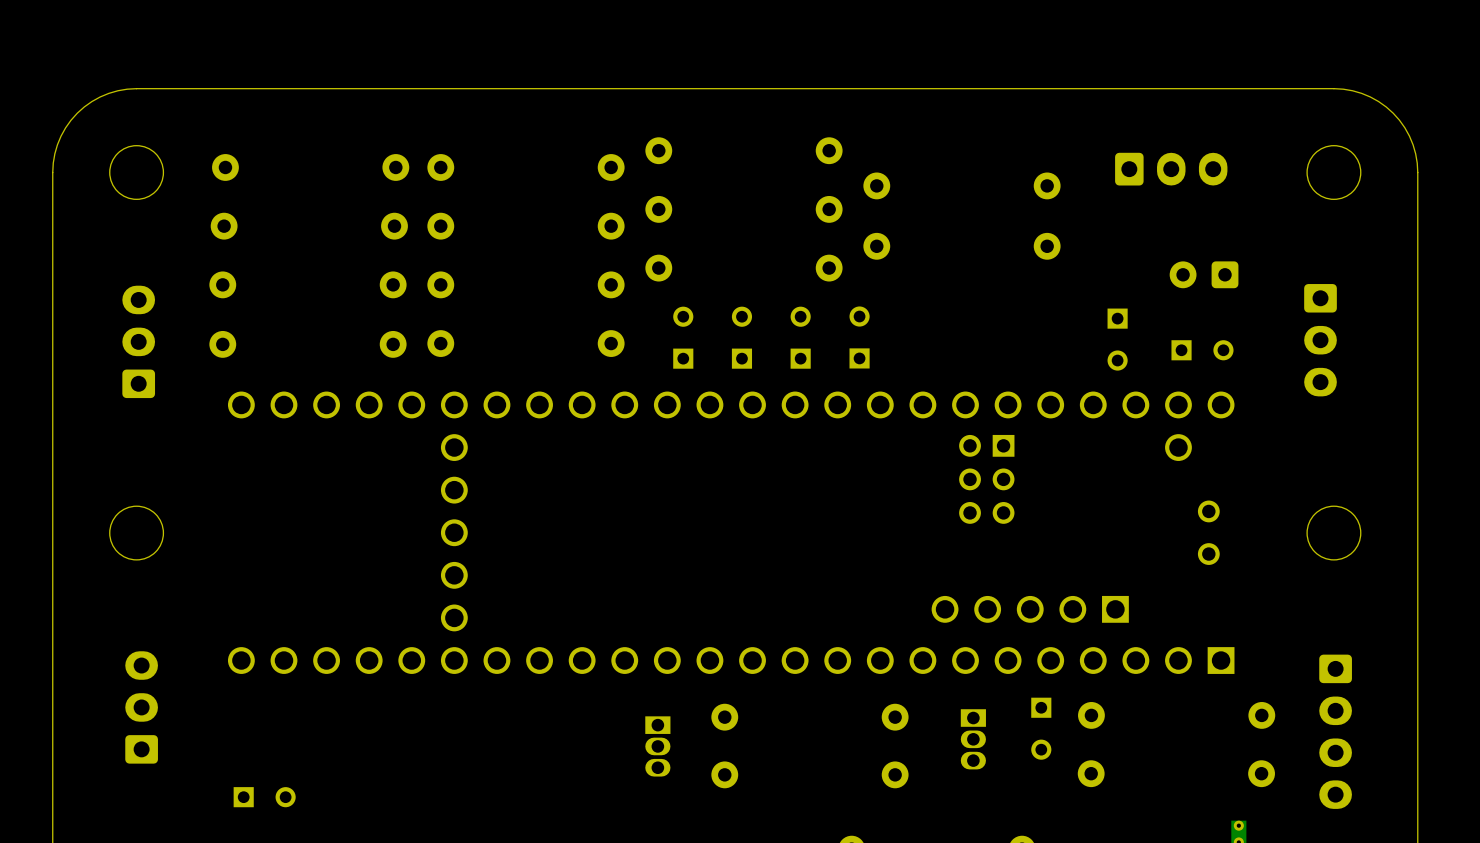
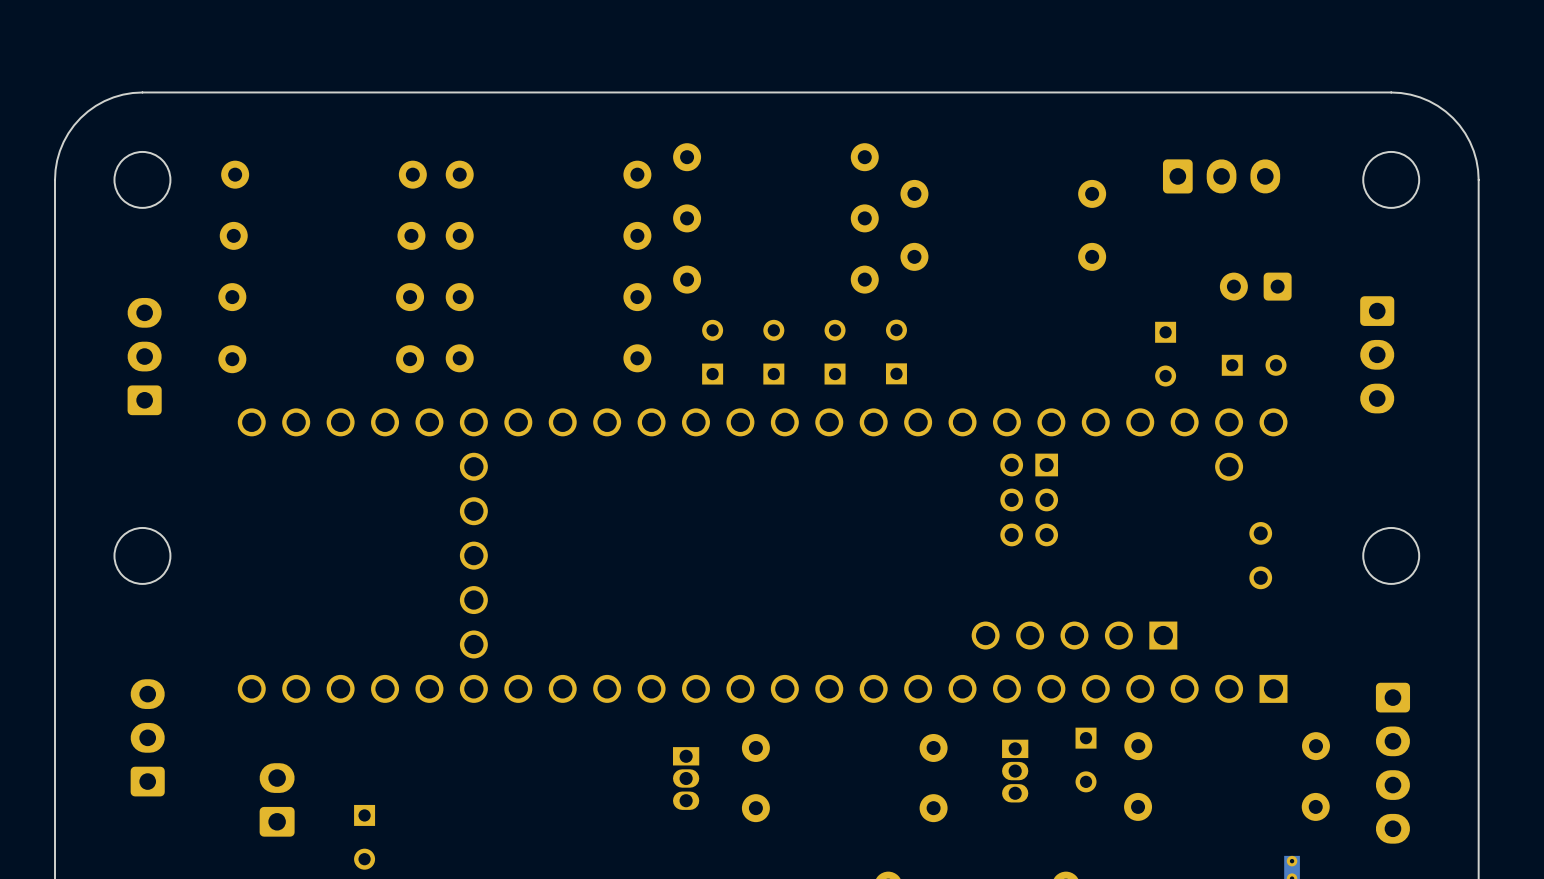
part: none -> (277, 799)
part rotation: 0° (264, 797) -> 90° clockwise (364, 837)
part position: (264, 797) -> (364, 837)

